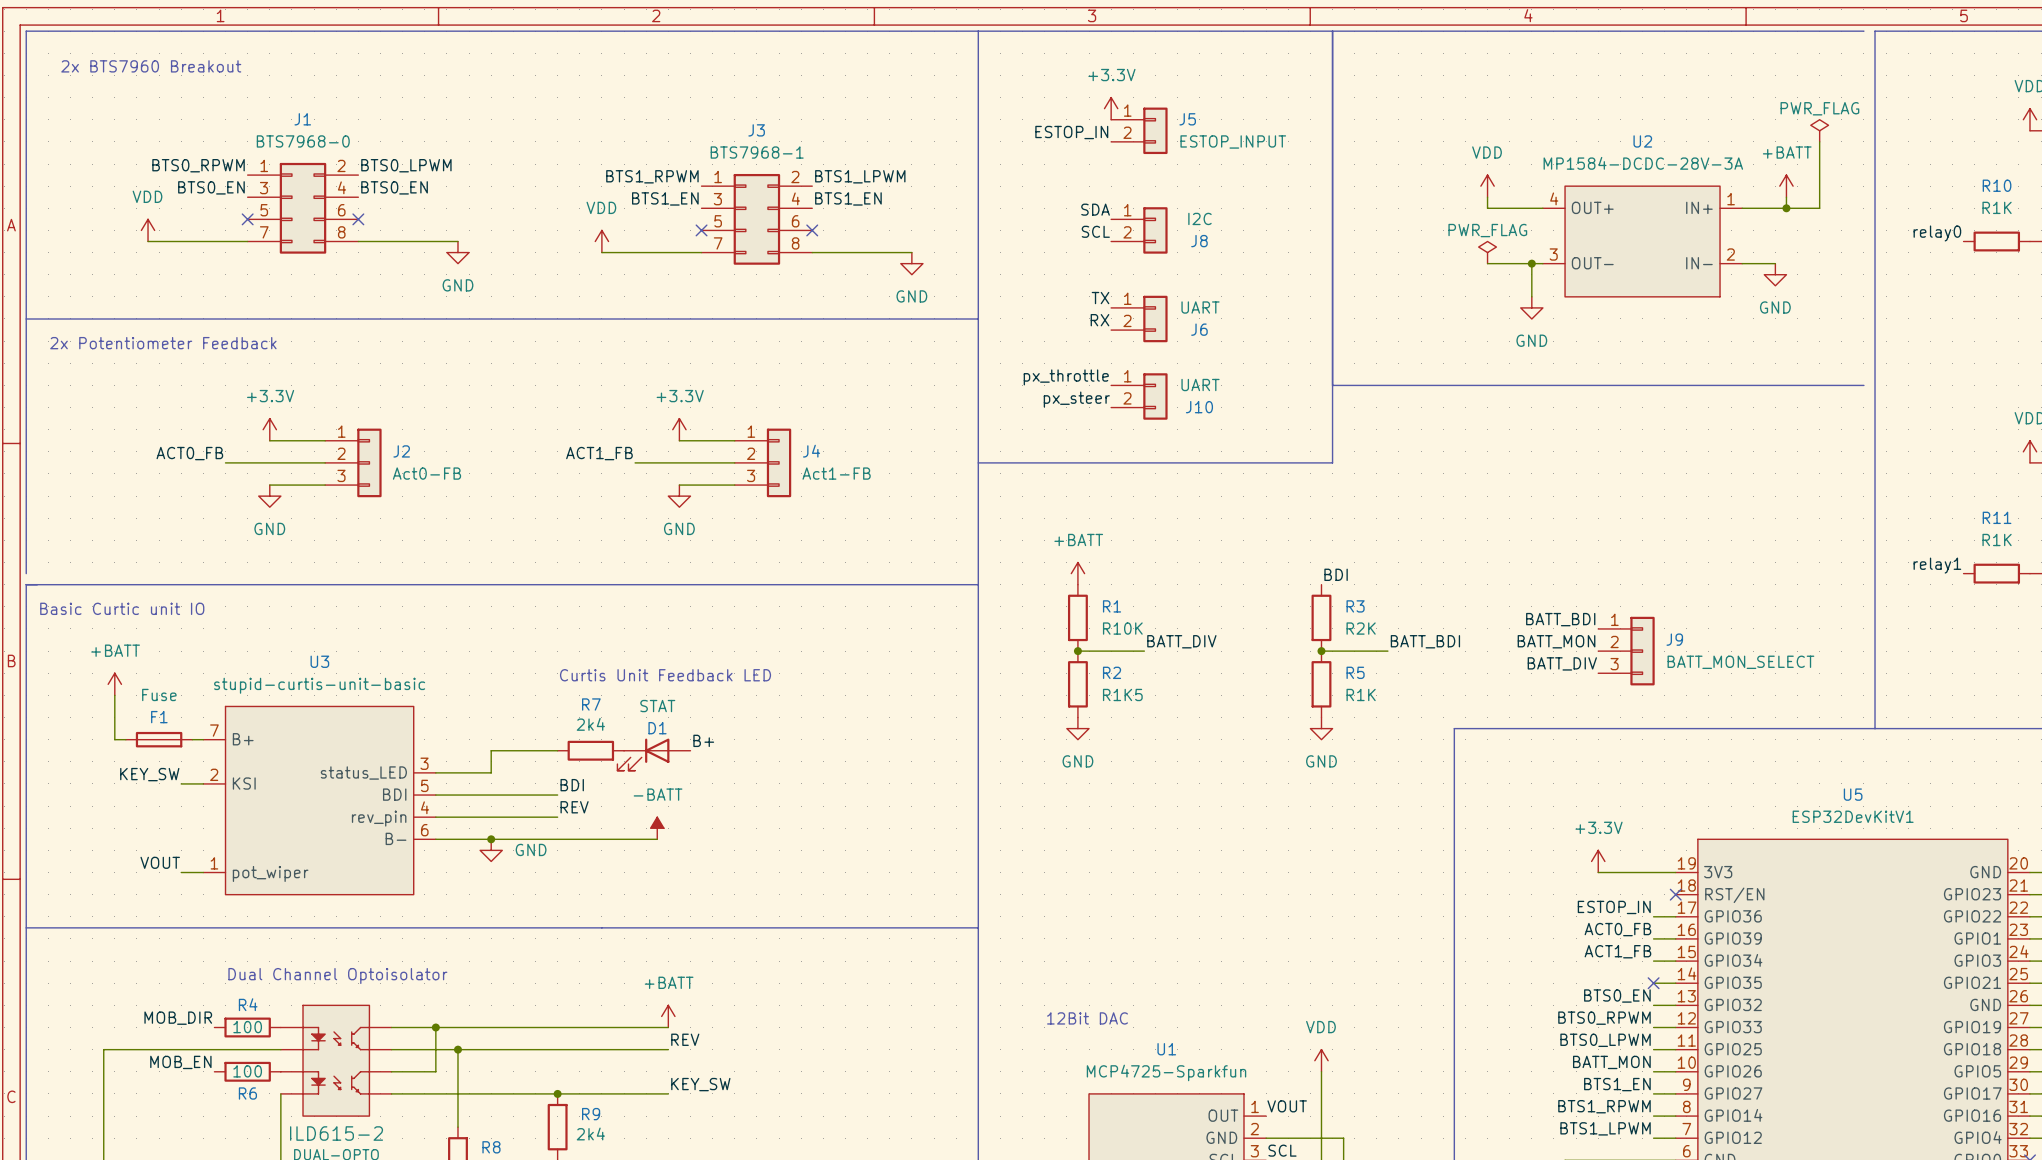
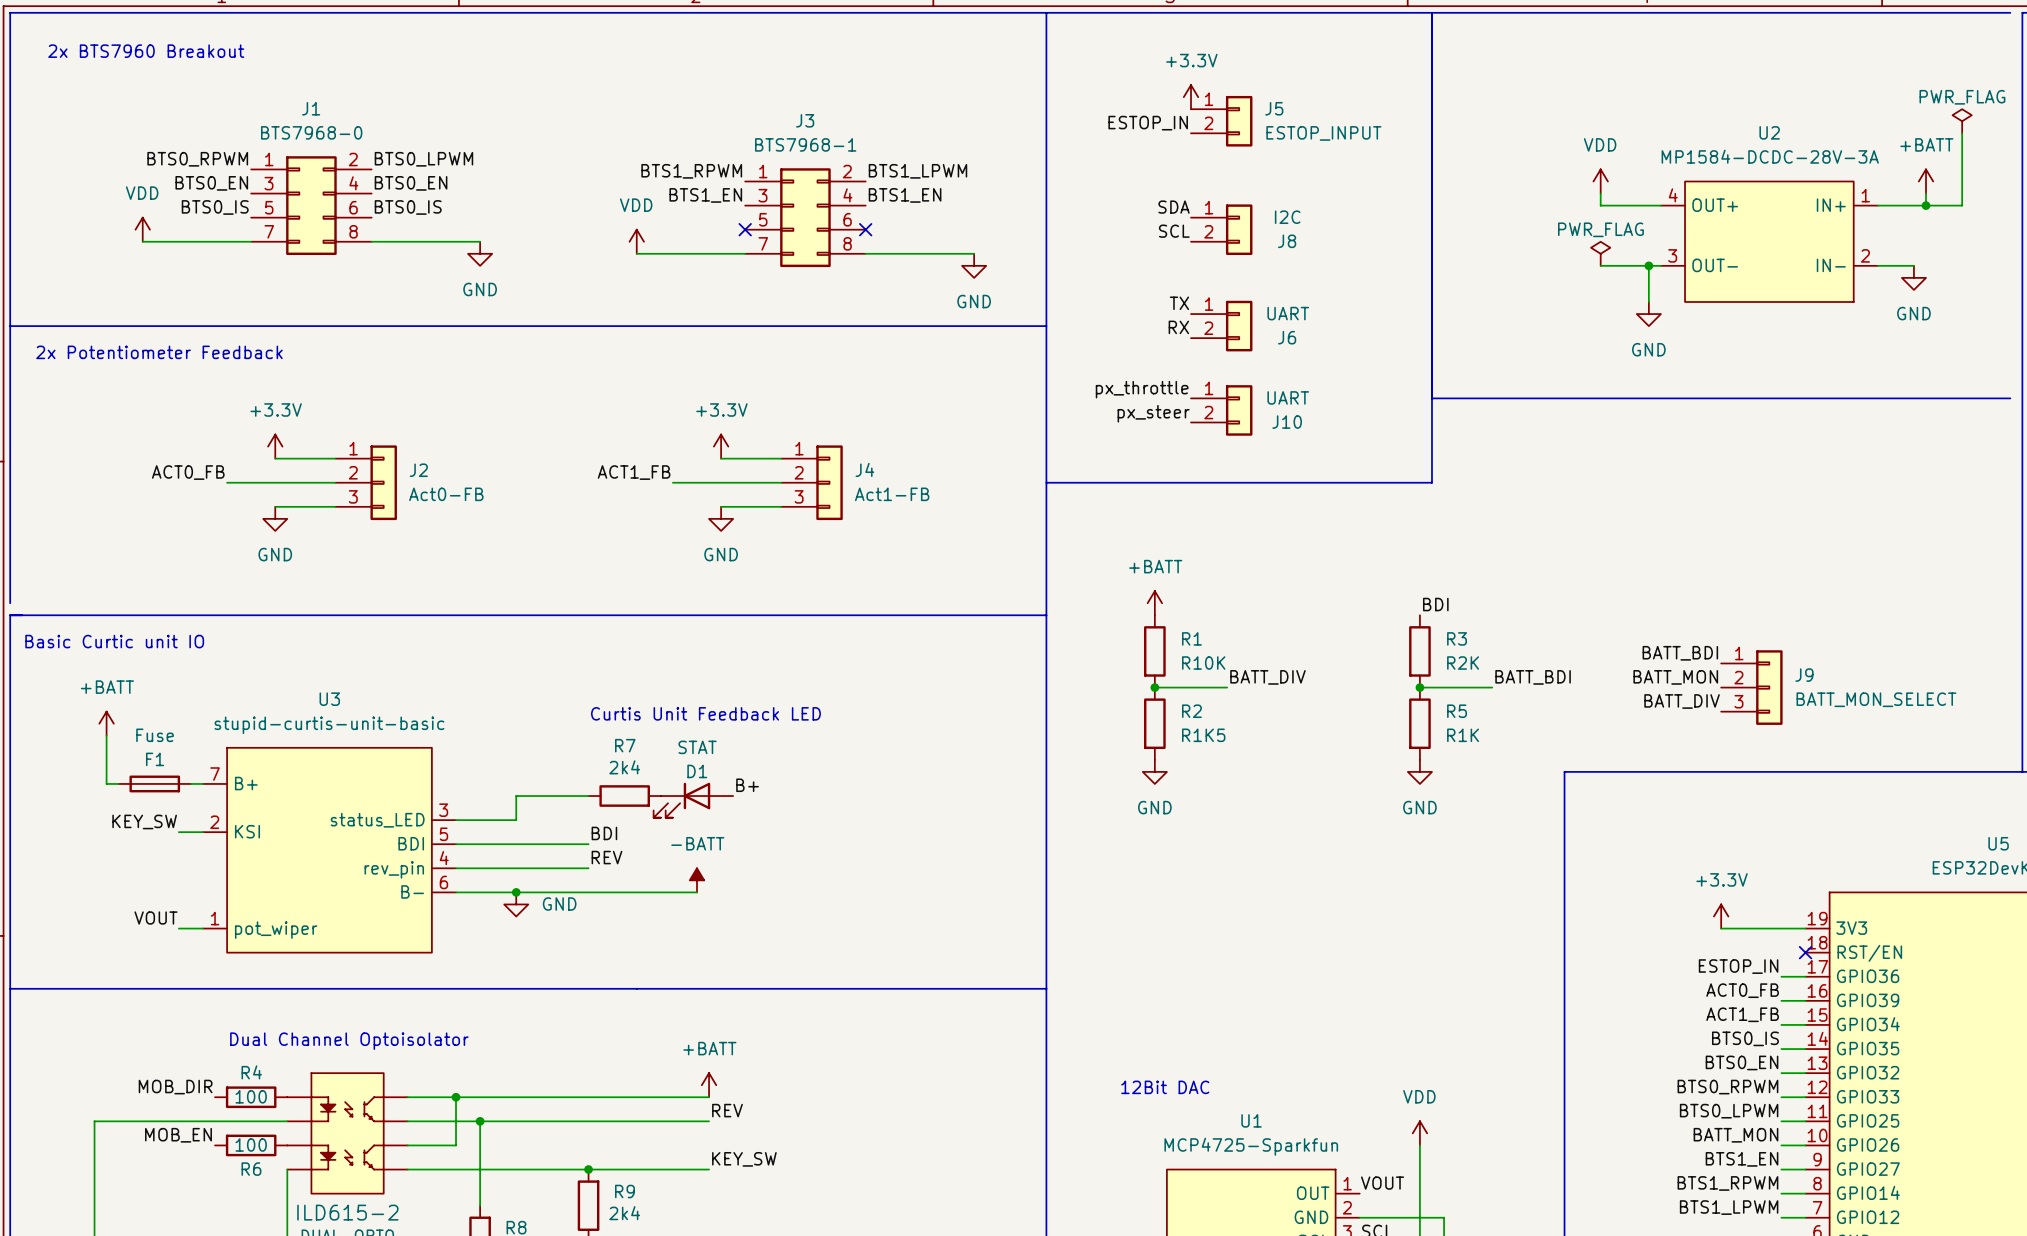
label: none -> BTS0_IS (215, 207)
label: none -> BTS0_IS (408, 207)
no-connect mark: (247, 219) -> none
no-connect mark: (358, 219) -> none
label: none -> BTS0_IS (1745, 1038)
no-connect mark: (1653, 983) -> none

